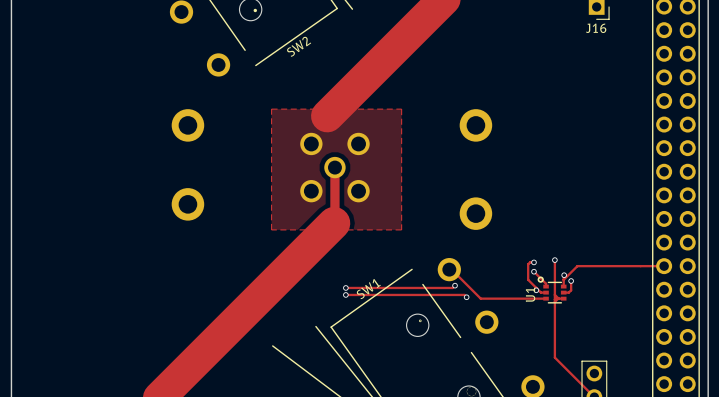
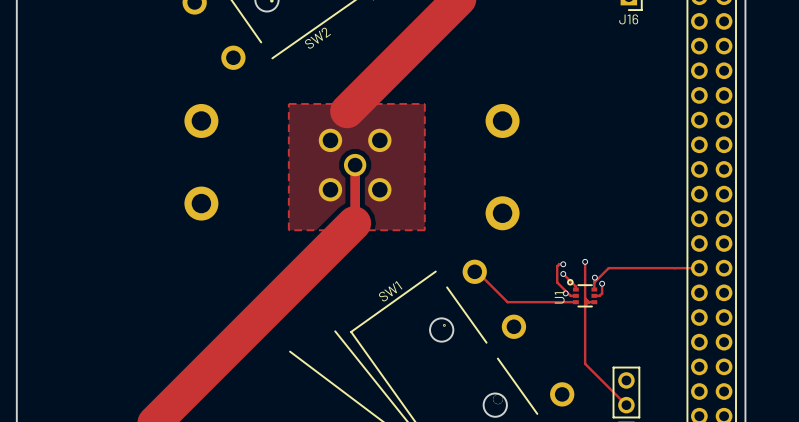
track: (455, 285) (452, 287) (345, 287) -> none
via: (455, 285) -> none
via: (345, 287) -> none
track: (345, 294) (464, 294) (466, 297) -> none
via: (345, 294) -> none
via: (466, 297) -> none

